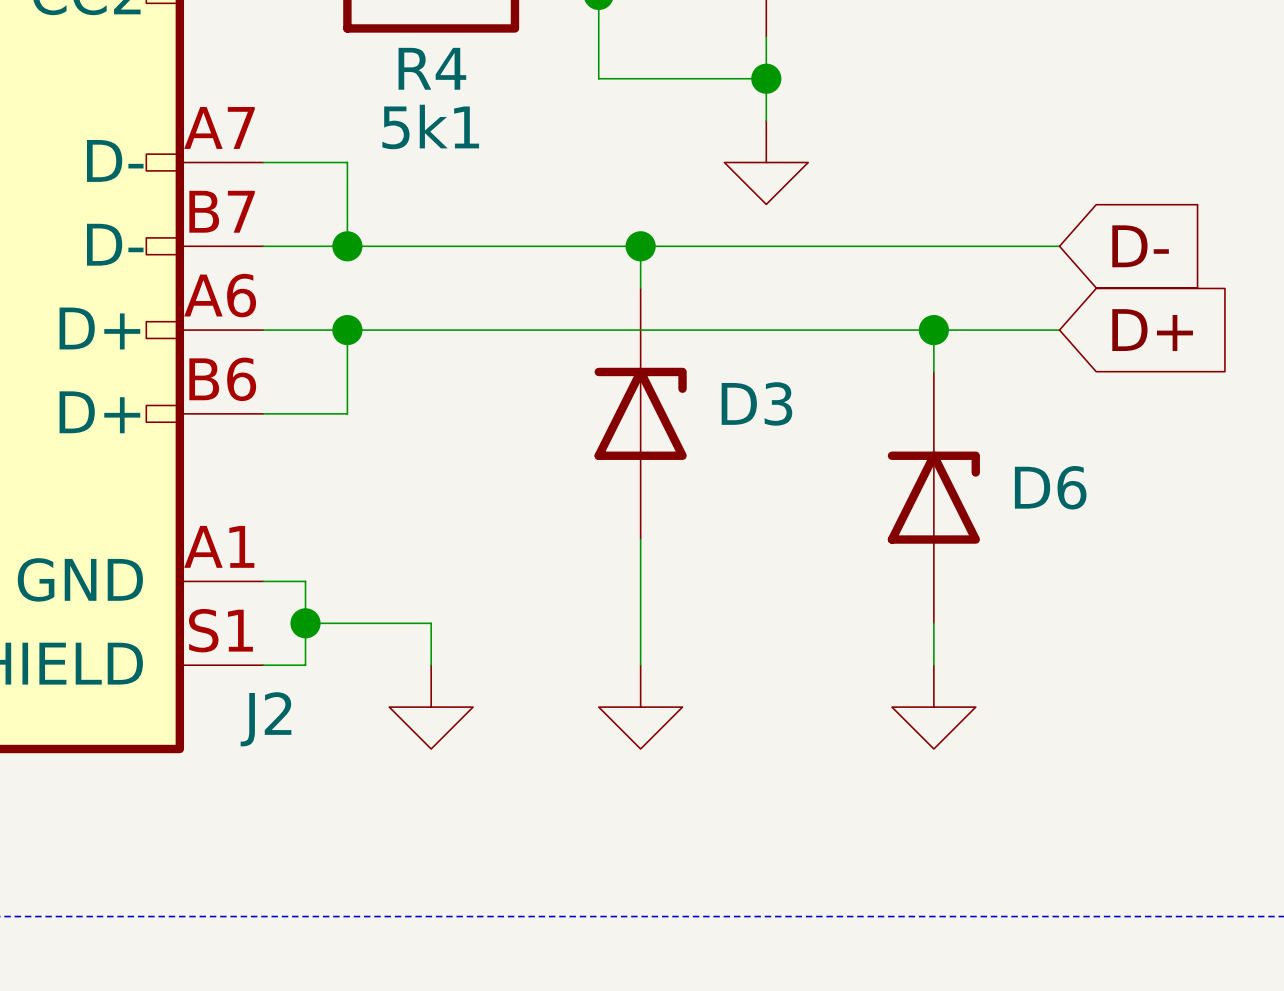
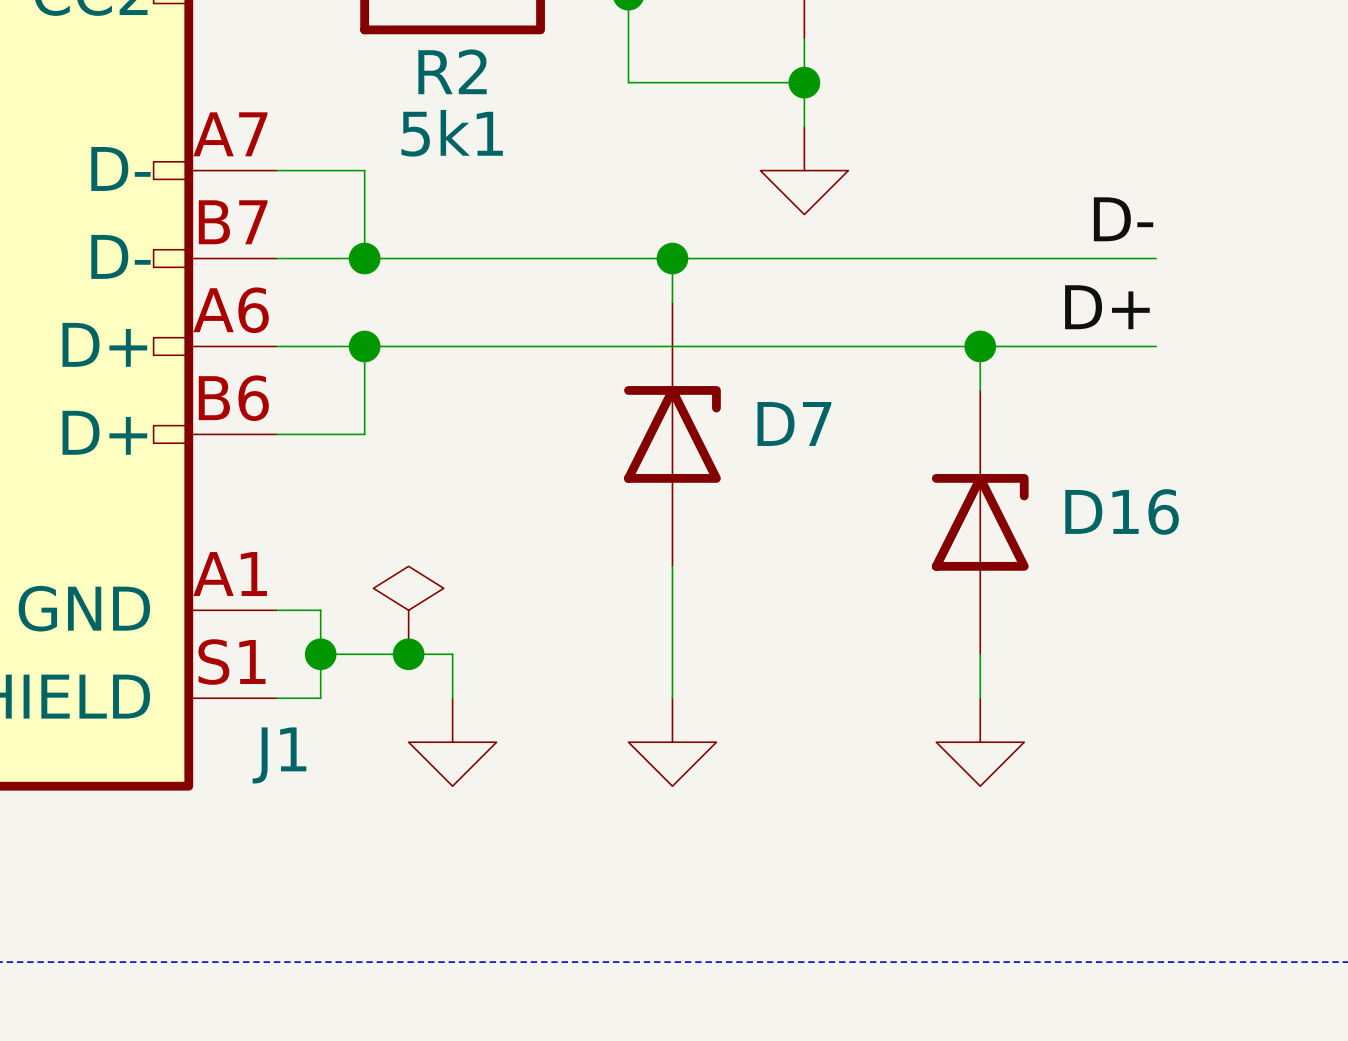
R4 name: R4 (432, 68) -> R2 (452, 71)
label: none -> D- (1123, 219)
wire: none -> (1112, 258) (1156, 258)
global label: D- (1140, 246) -> none
label: none -> D+ (1107, 307)
wire: none -> (1112, 346) (1156, 346)
global label: D+ (1152, 330) -> none
D3 name: D3 (756, 403) -> D7 (794, 423)
D6 name: D6 (1050, 487) -> D16 (1122, 511)
power symbol: none -> (408, 610)
junction: none -> (408, 654)
J2 name: J2 (266, 719) -> J1 (279, 755)

